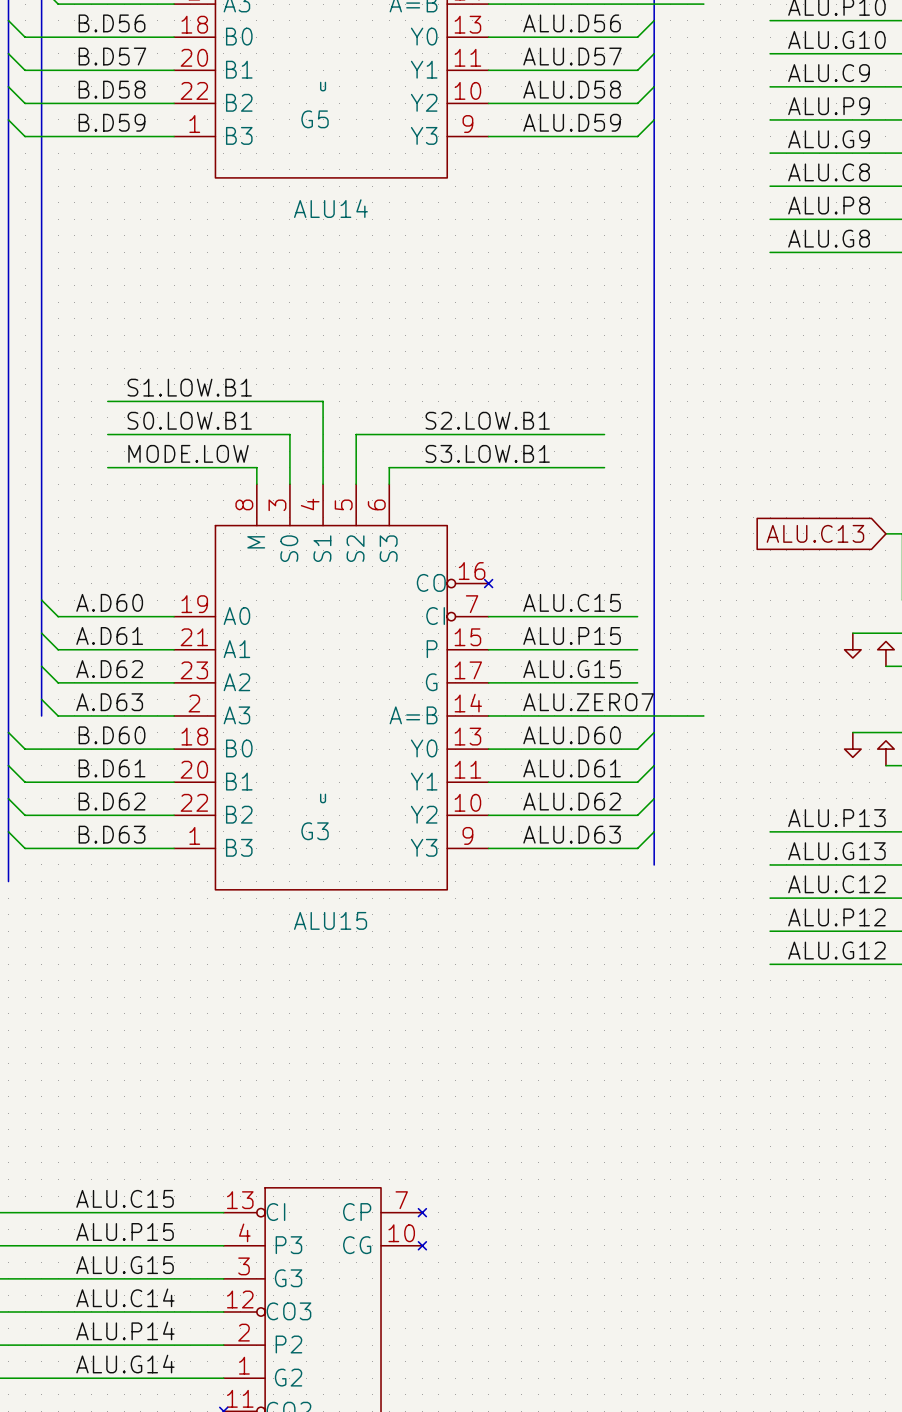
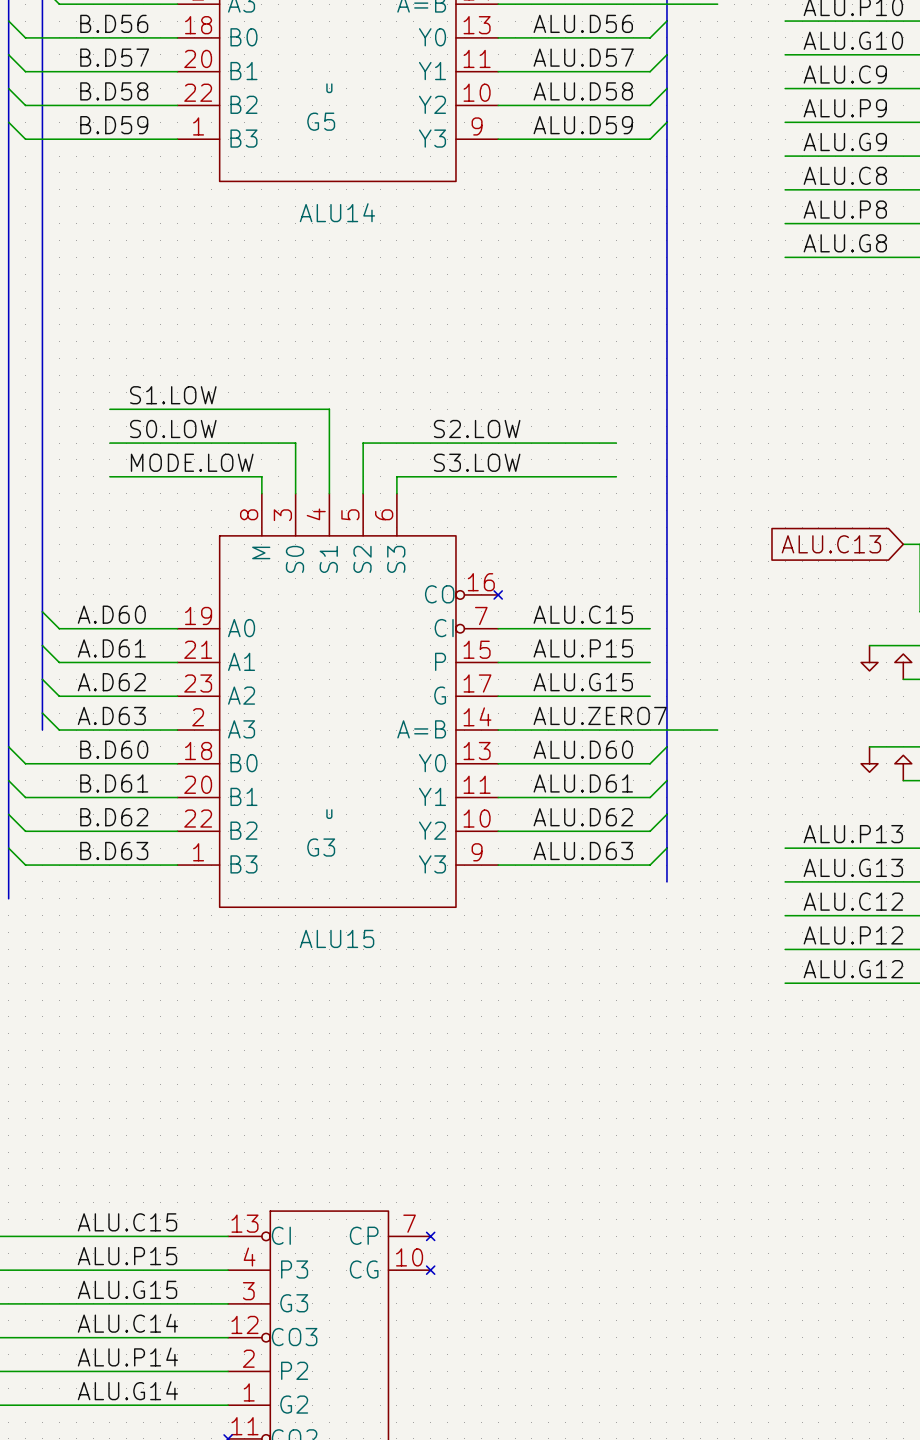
label: S1.LOW.B1 (189, 387) -> S1.LOW (173, 395)
label: S0.LOW.B1 (189, 420) -> S0.LOW (173, 428)
label: S2.LOW.B1 (487, 420) -> S2.LOW (477, 428)
label: S3.LOW.B1 (487, 453) -> S3.LOW (477, 462)

